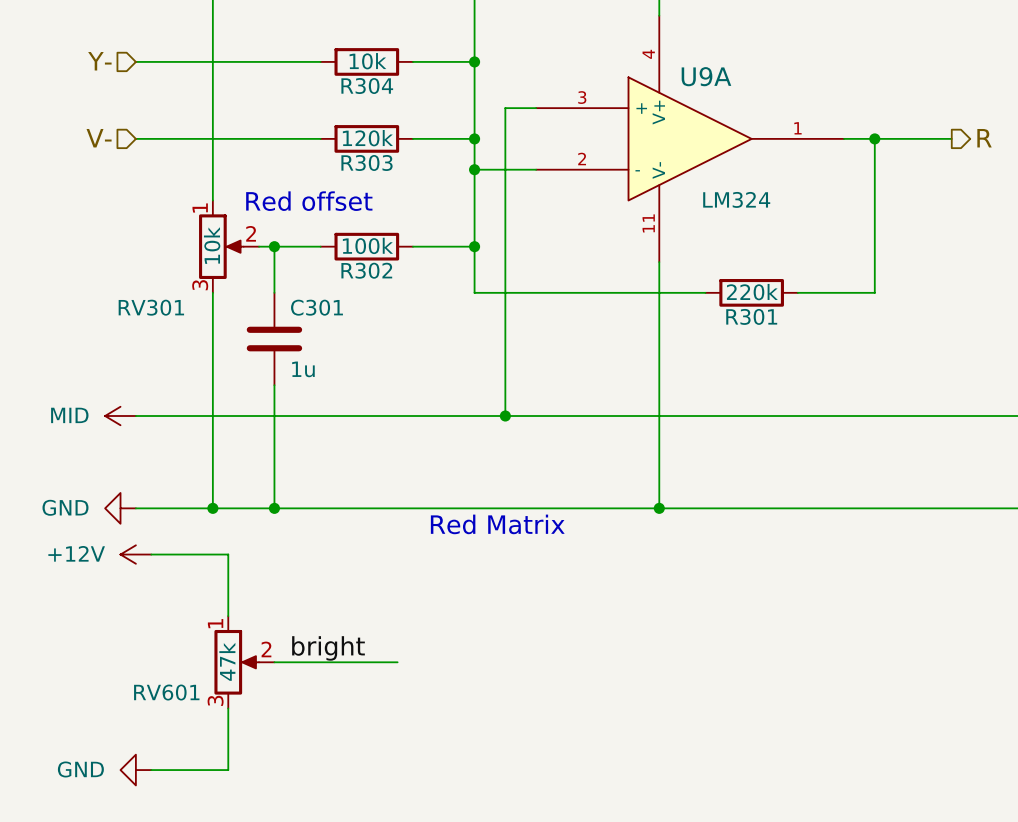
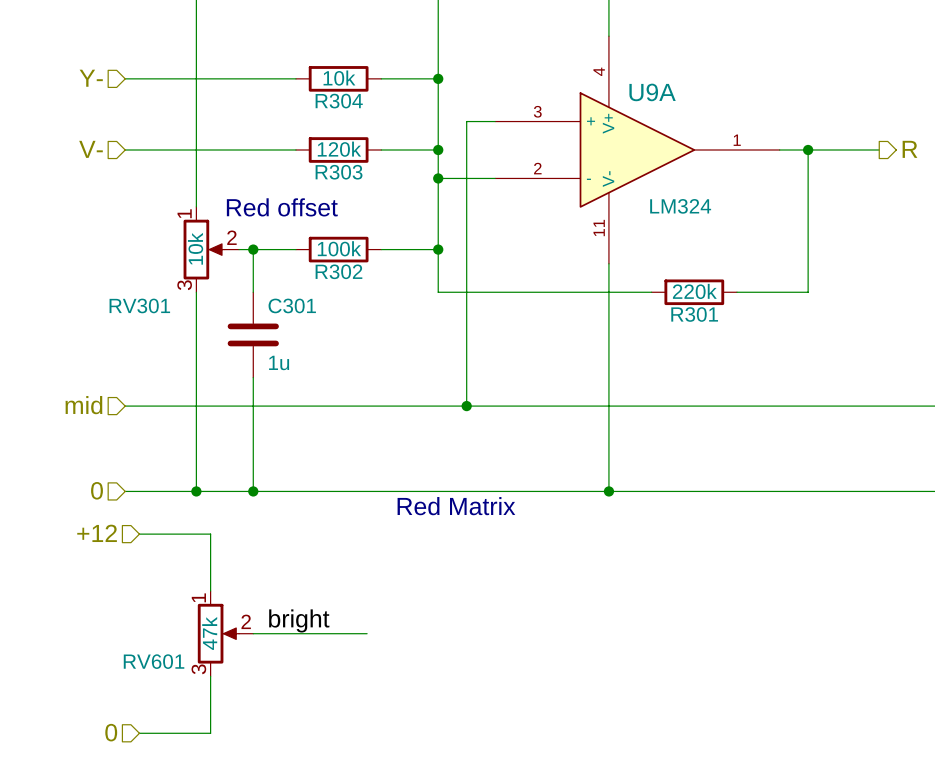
hierarchical label: none -> mid (83, 405)
power symbol: MID (120, 416) -> none
hierarchical label: none -> 0 (97, 490)
power symbol: GND (120, 508) -> none
hierarchical label: none -> +12 (97, 533)
power symbol: +12V (135, 554) -> none
hierarchical label: none -> 0 (111, 732)
power symbol: GND (135, 770) -> none

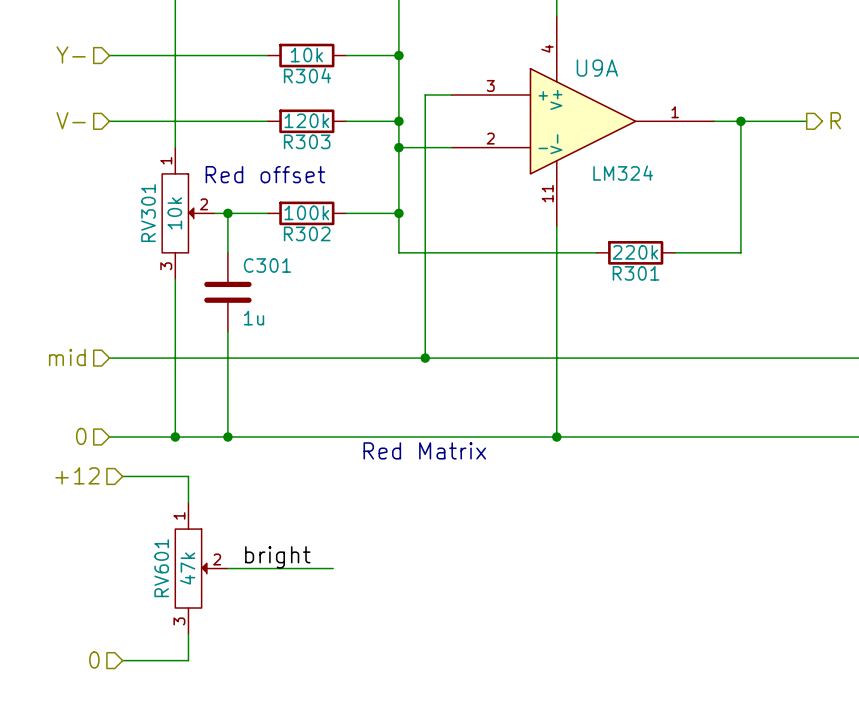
RV301 symbol: [183, 206, 240, 293] -> [162, 147, 215, 280]
RV301 name position: RV301 (139, 305) -> RV301 (148, 213)
RV601 symbol: [197, 591, 254, 677] -> [175, 502, 228, 635]
RV601 name position: RV601 (154, 661) -> RV601 (161, 568)

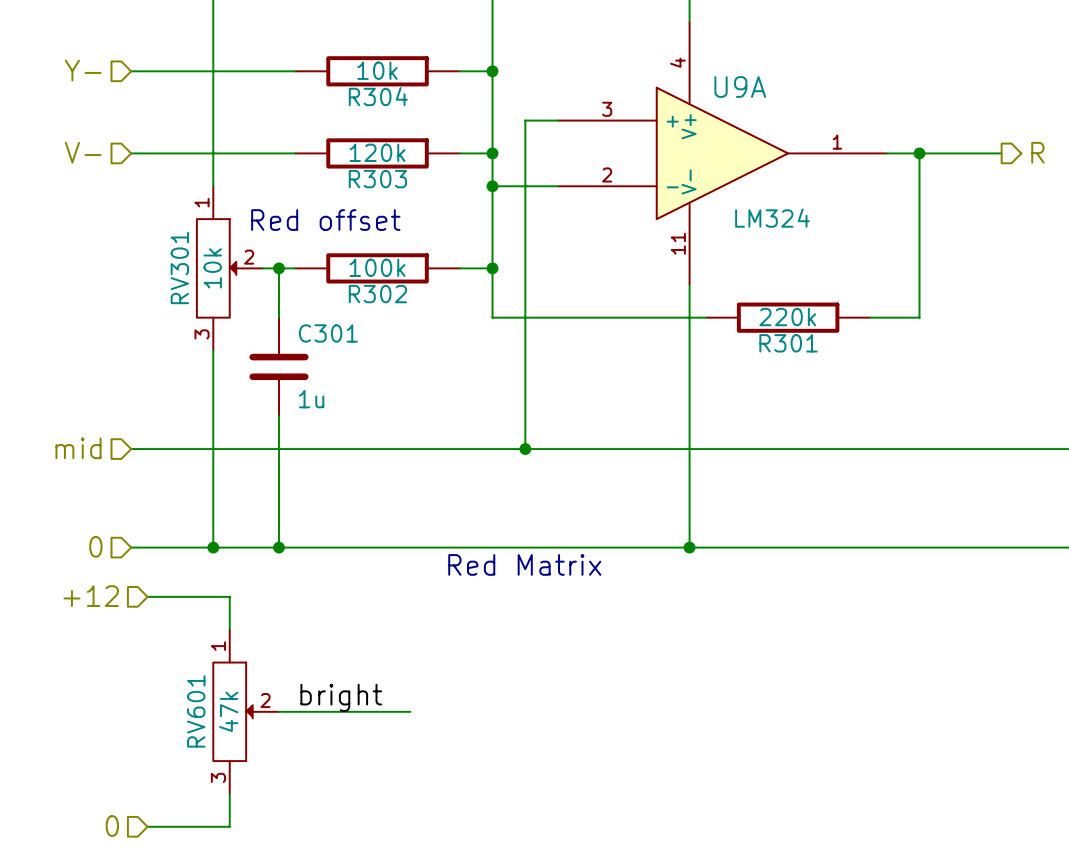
R304 symbol: [267, 43, 347, 68] -> [295, 56, 460, 87]
R303 symbol: [267, 109, 347, 134] -> [295, 138, 460, 169]
R302 symbol: [267, 201, 347, 226] -> [295, 253, 460, 284]
R301 symbol: [596, 241, 676, 265] -> [706, 302, 871, 333]

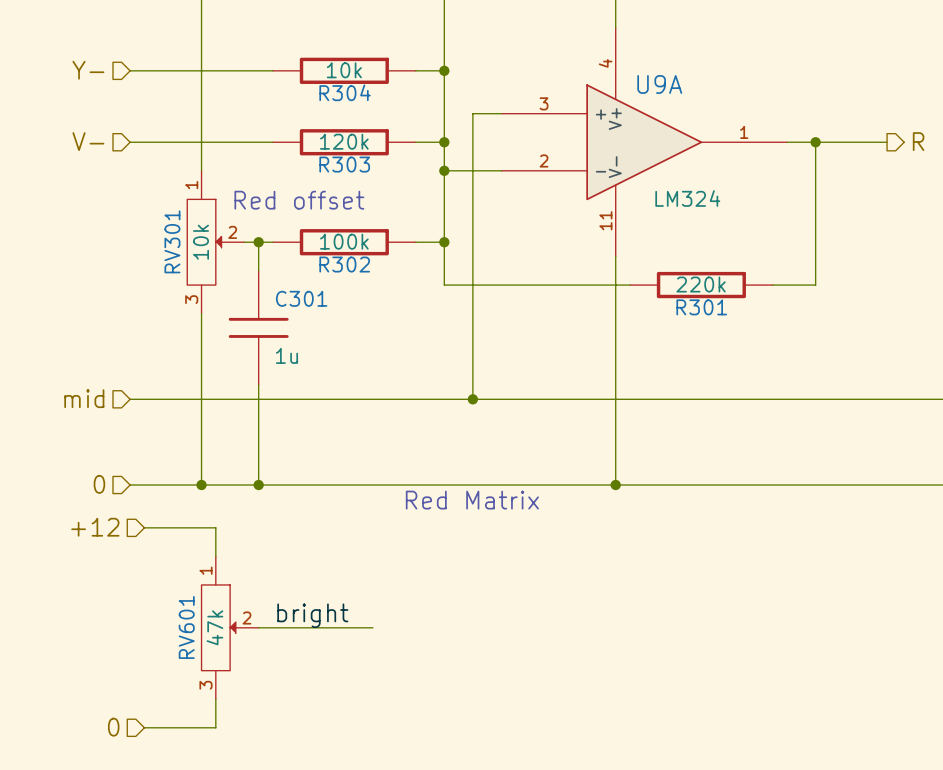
C301 symbol: [249, 317, 309, 417] -> [228, 270, 289, 386]

